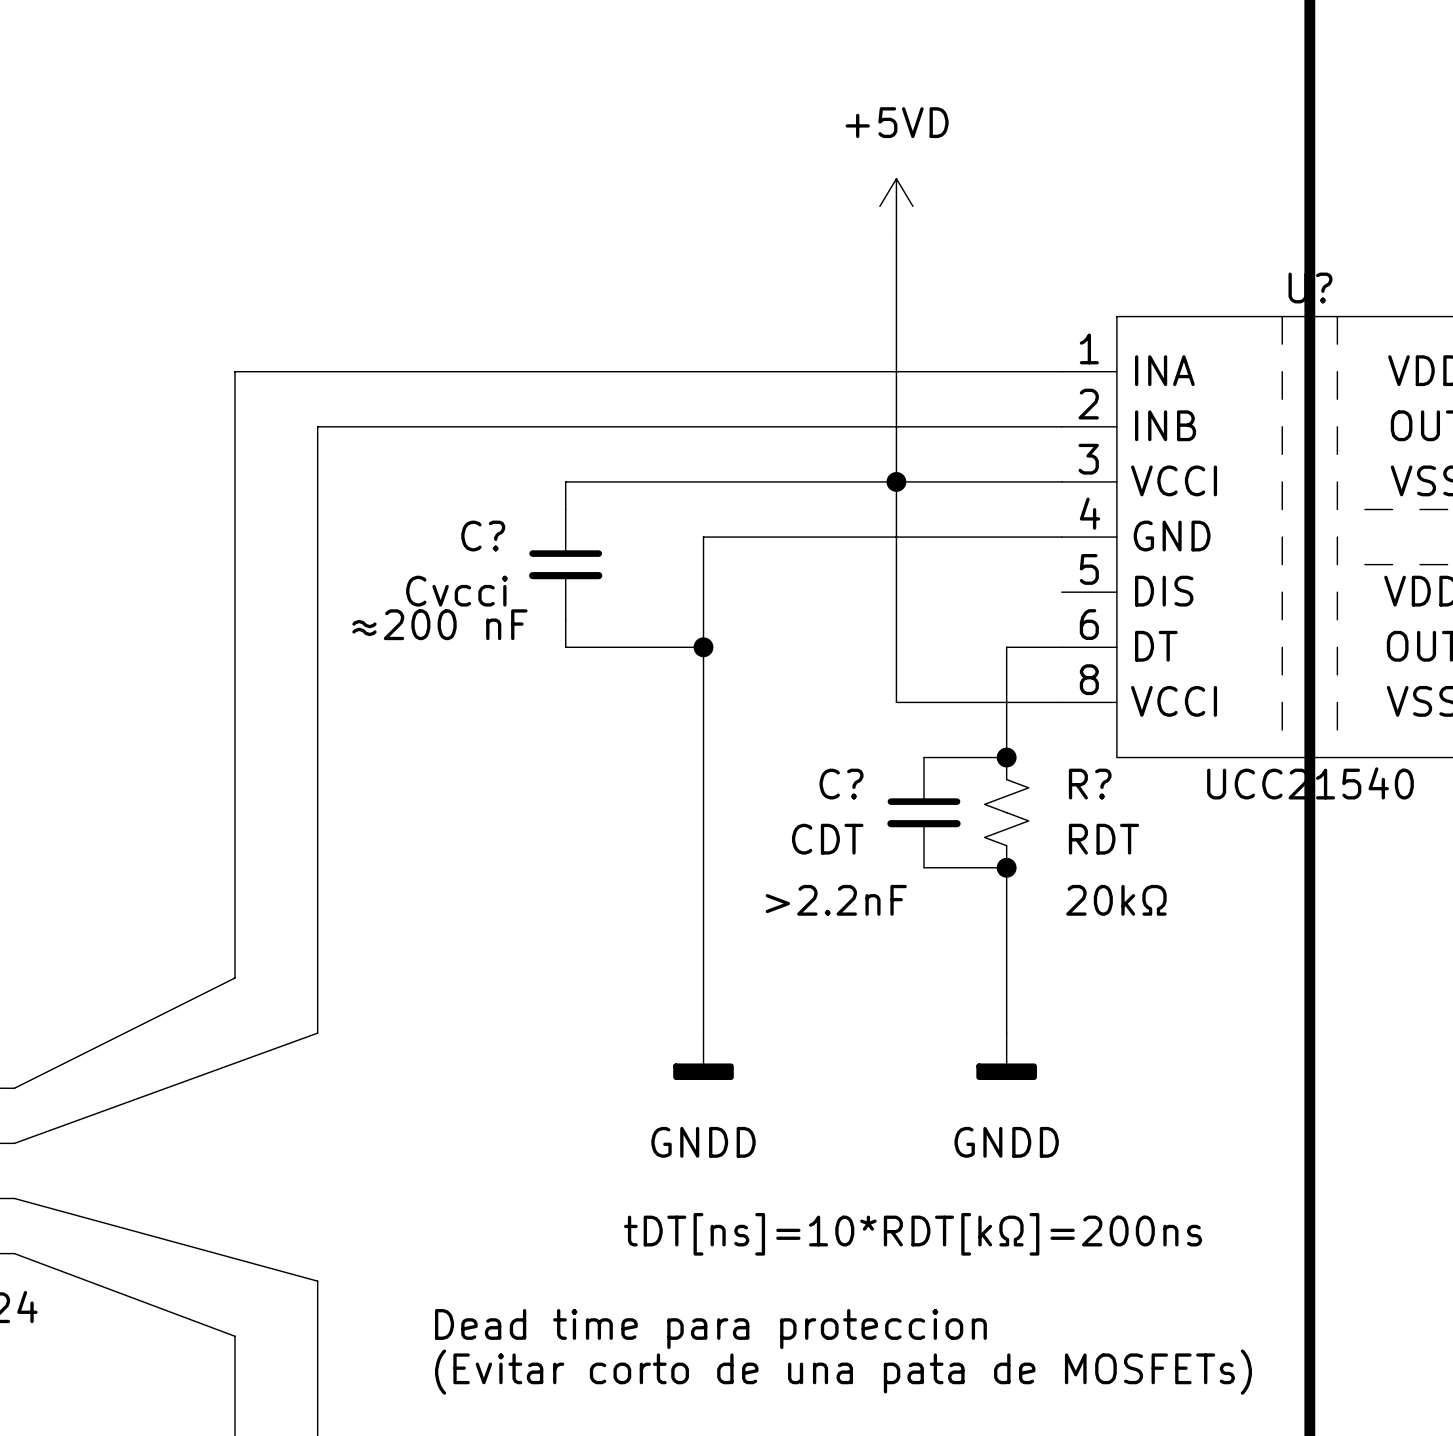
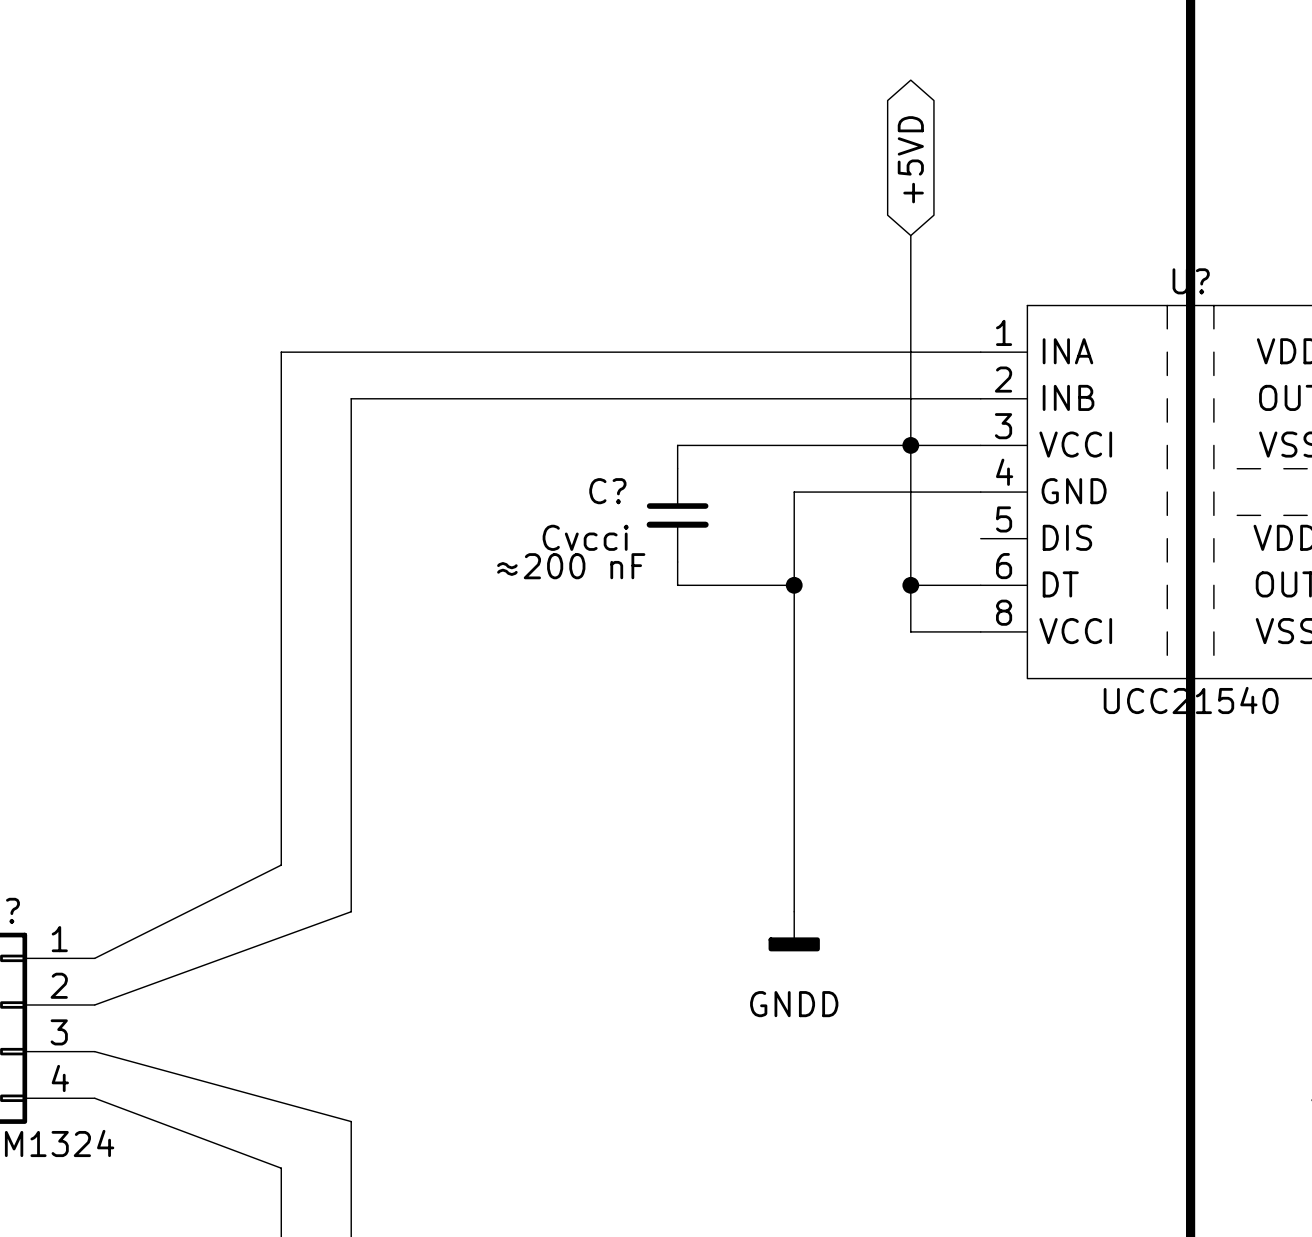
global label: none -> +5VD (910, 159)
power symbol: +5VD (896, 206) -> none
wire: (896, 233) (896, 702) (979, 702) -> (910, 235) (910, 631)
wire: (703, 481) (565, 481) (565, 509) -> (677, 445) (677, 468)
junction position: (896, 481) -> (910, 445)
wire: (841, 537) (703, 537) (703, 619) -> (794, 492) (794, 911)
C? position: (565, 564) -> (677, 515)
wire: (565, 619) (565, 647) (703, 647) (703, 1033) -> none
text position: ≈200 nF (439, 624) -> ≈200 nF (571, 566)
wire: none -> (677, 585) (794, 585)
junction: (703, 647) -> none
junction: none -> (794, 585)
junction: none -> (910, 585)
wire: (1006, 647) (1006, 757) (923, 757) -> (934, 585) (910, 585)
junction: (1006, 757) -> none
C?: CDT (923, 812) -> none
R?: RDT (1006, 812) -> none
wire: (923, 867) (1006, 867) (1006, 1033) -> none
junction: (1006, 867) -> none
text: >2.2nF (836, 900) -> none
text: 20kΩ (1116, 900) -> none
power symbol: GNDD (703, 1056) -> none
power symbol: none -> GNDD (794, 931)
power symbol: GNDD (1006, 1056) -> none
text: tDT[ns]=10*RDT[kΩ]=200ns (913, 1234) -> none
text: Dead time para proteccion (710, 1329) -> none
text: (Evitar corto de una pata de MOSFETs) (843, 1372) -> none

